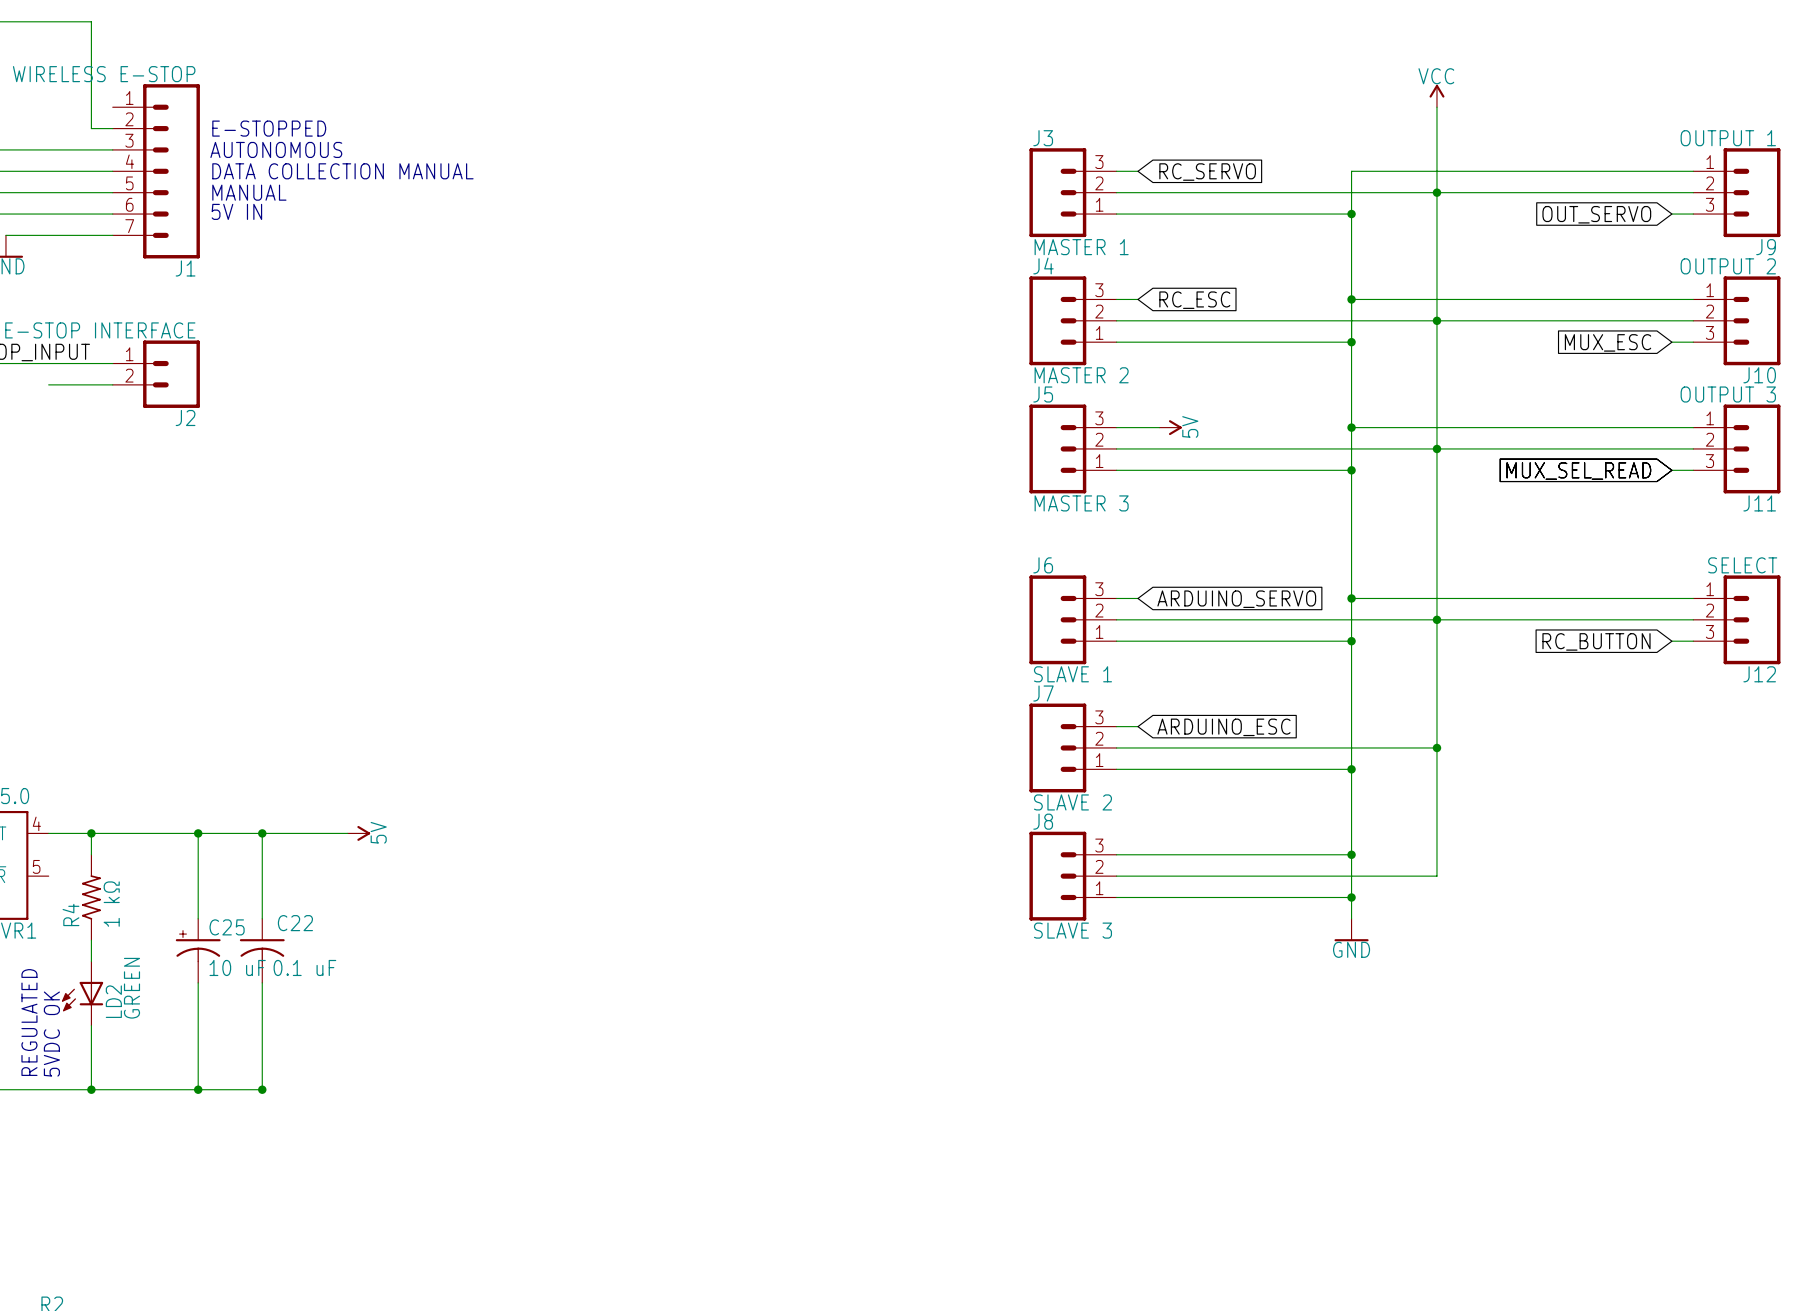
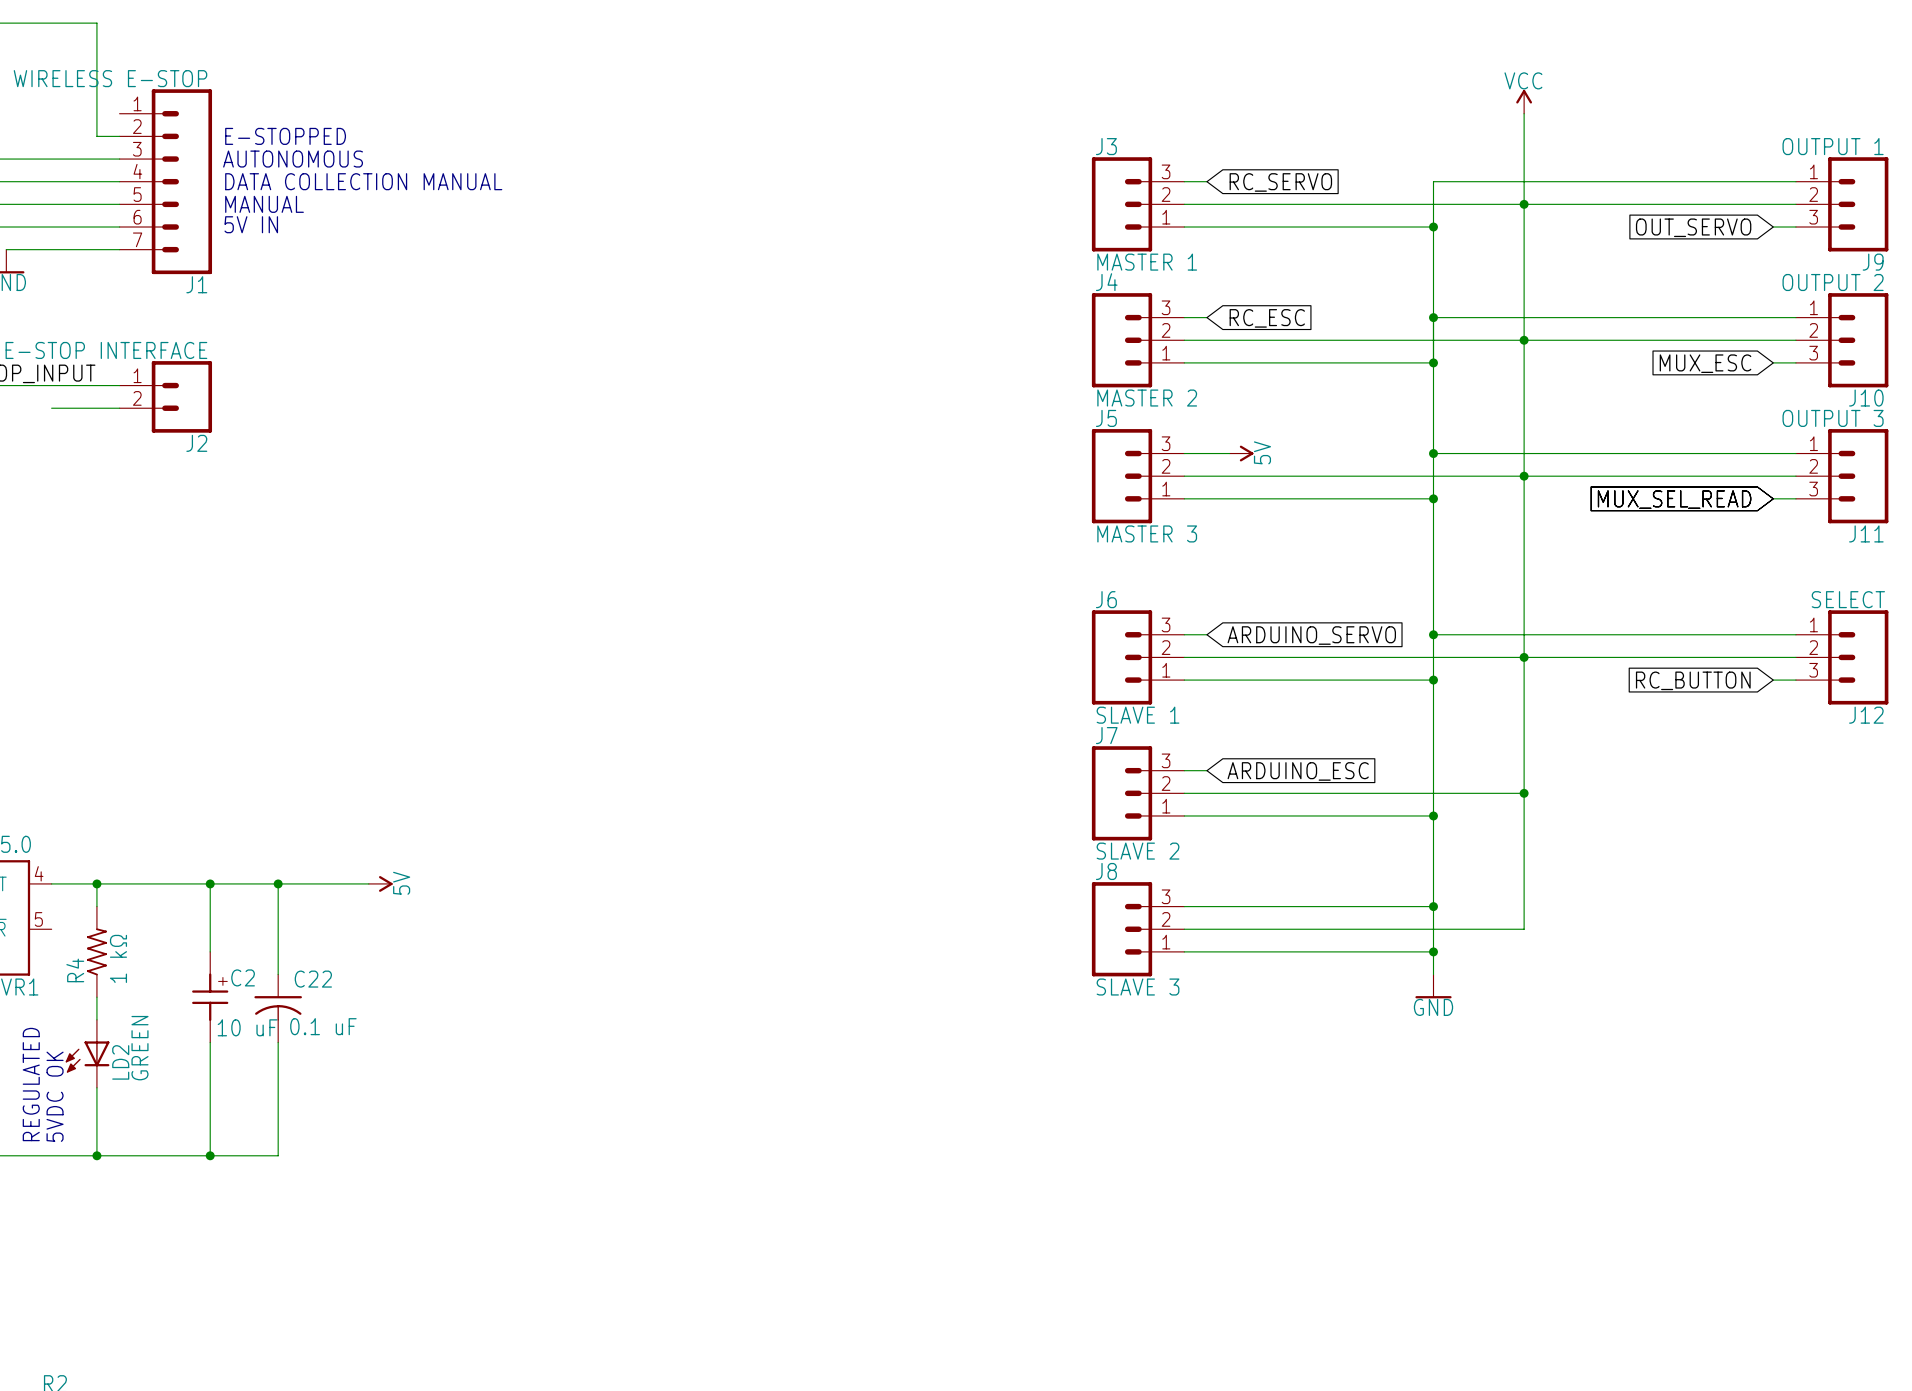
C2: none -> 10 uF (210, 997)
C25: 10 uF (198, 950) -> none
junction: (262, 1089) -> none

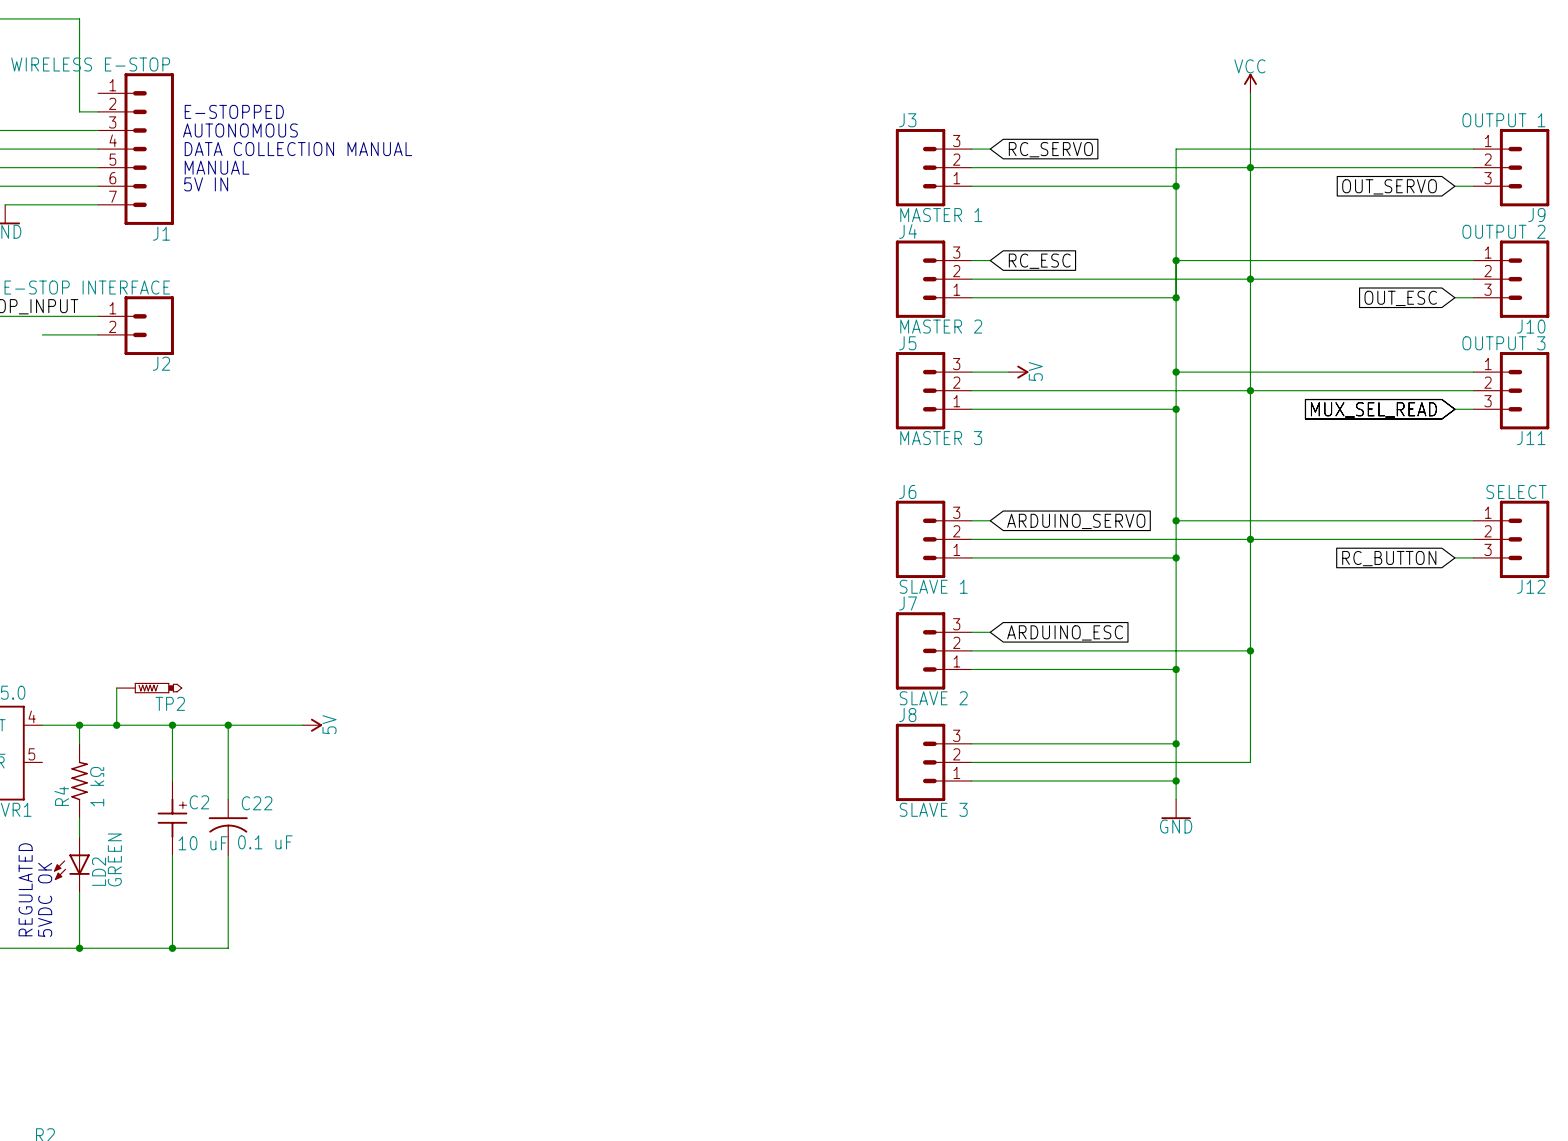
global label: MUX_ESC (1705, 363) -> OUT_ESC (1400, 298)
wire: none -> (116, 688) (116, 725)
TP2: none -> (149, 688)
junction: none -> (116, 725)

